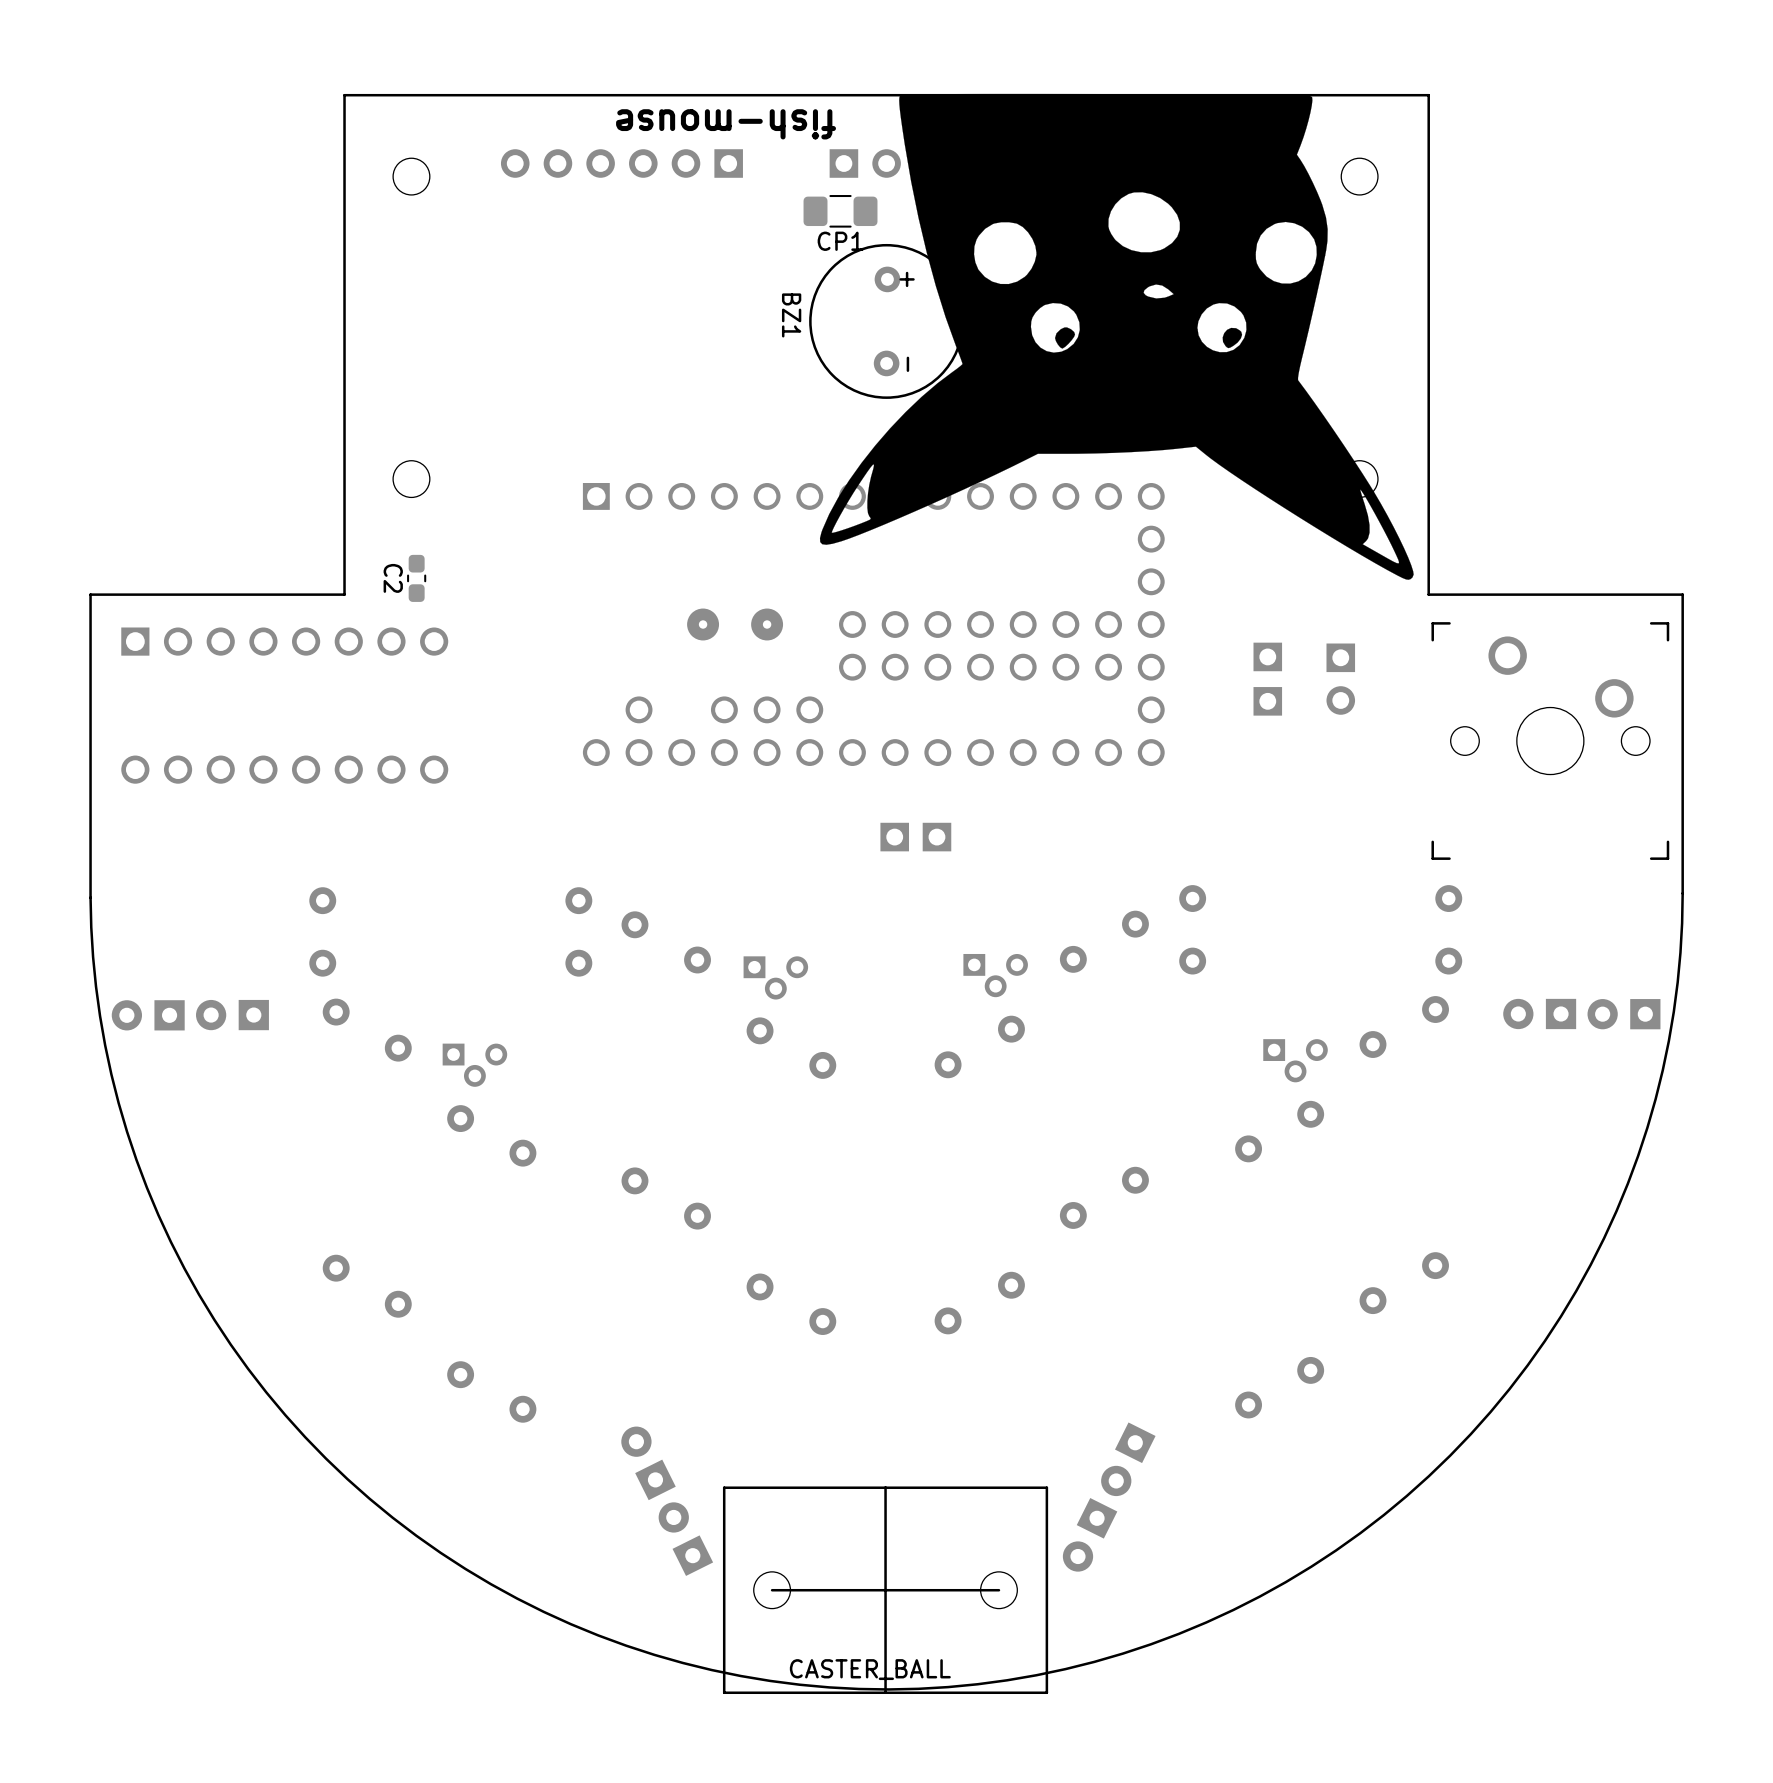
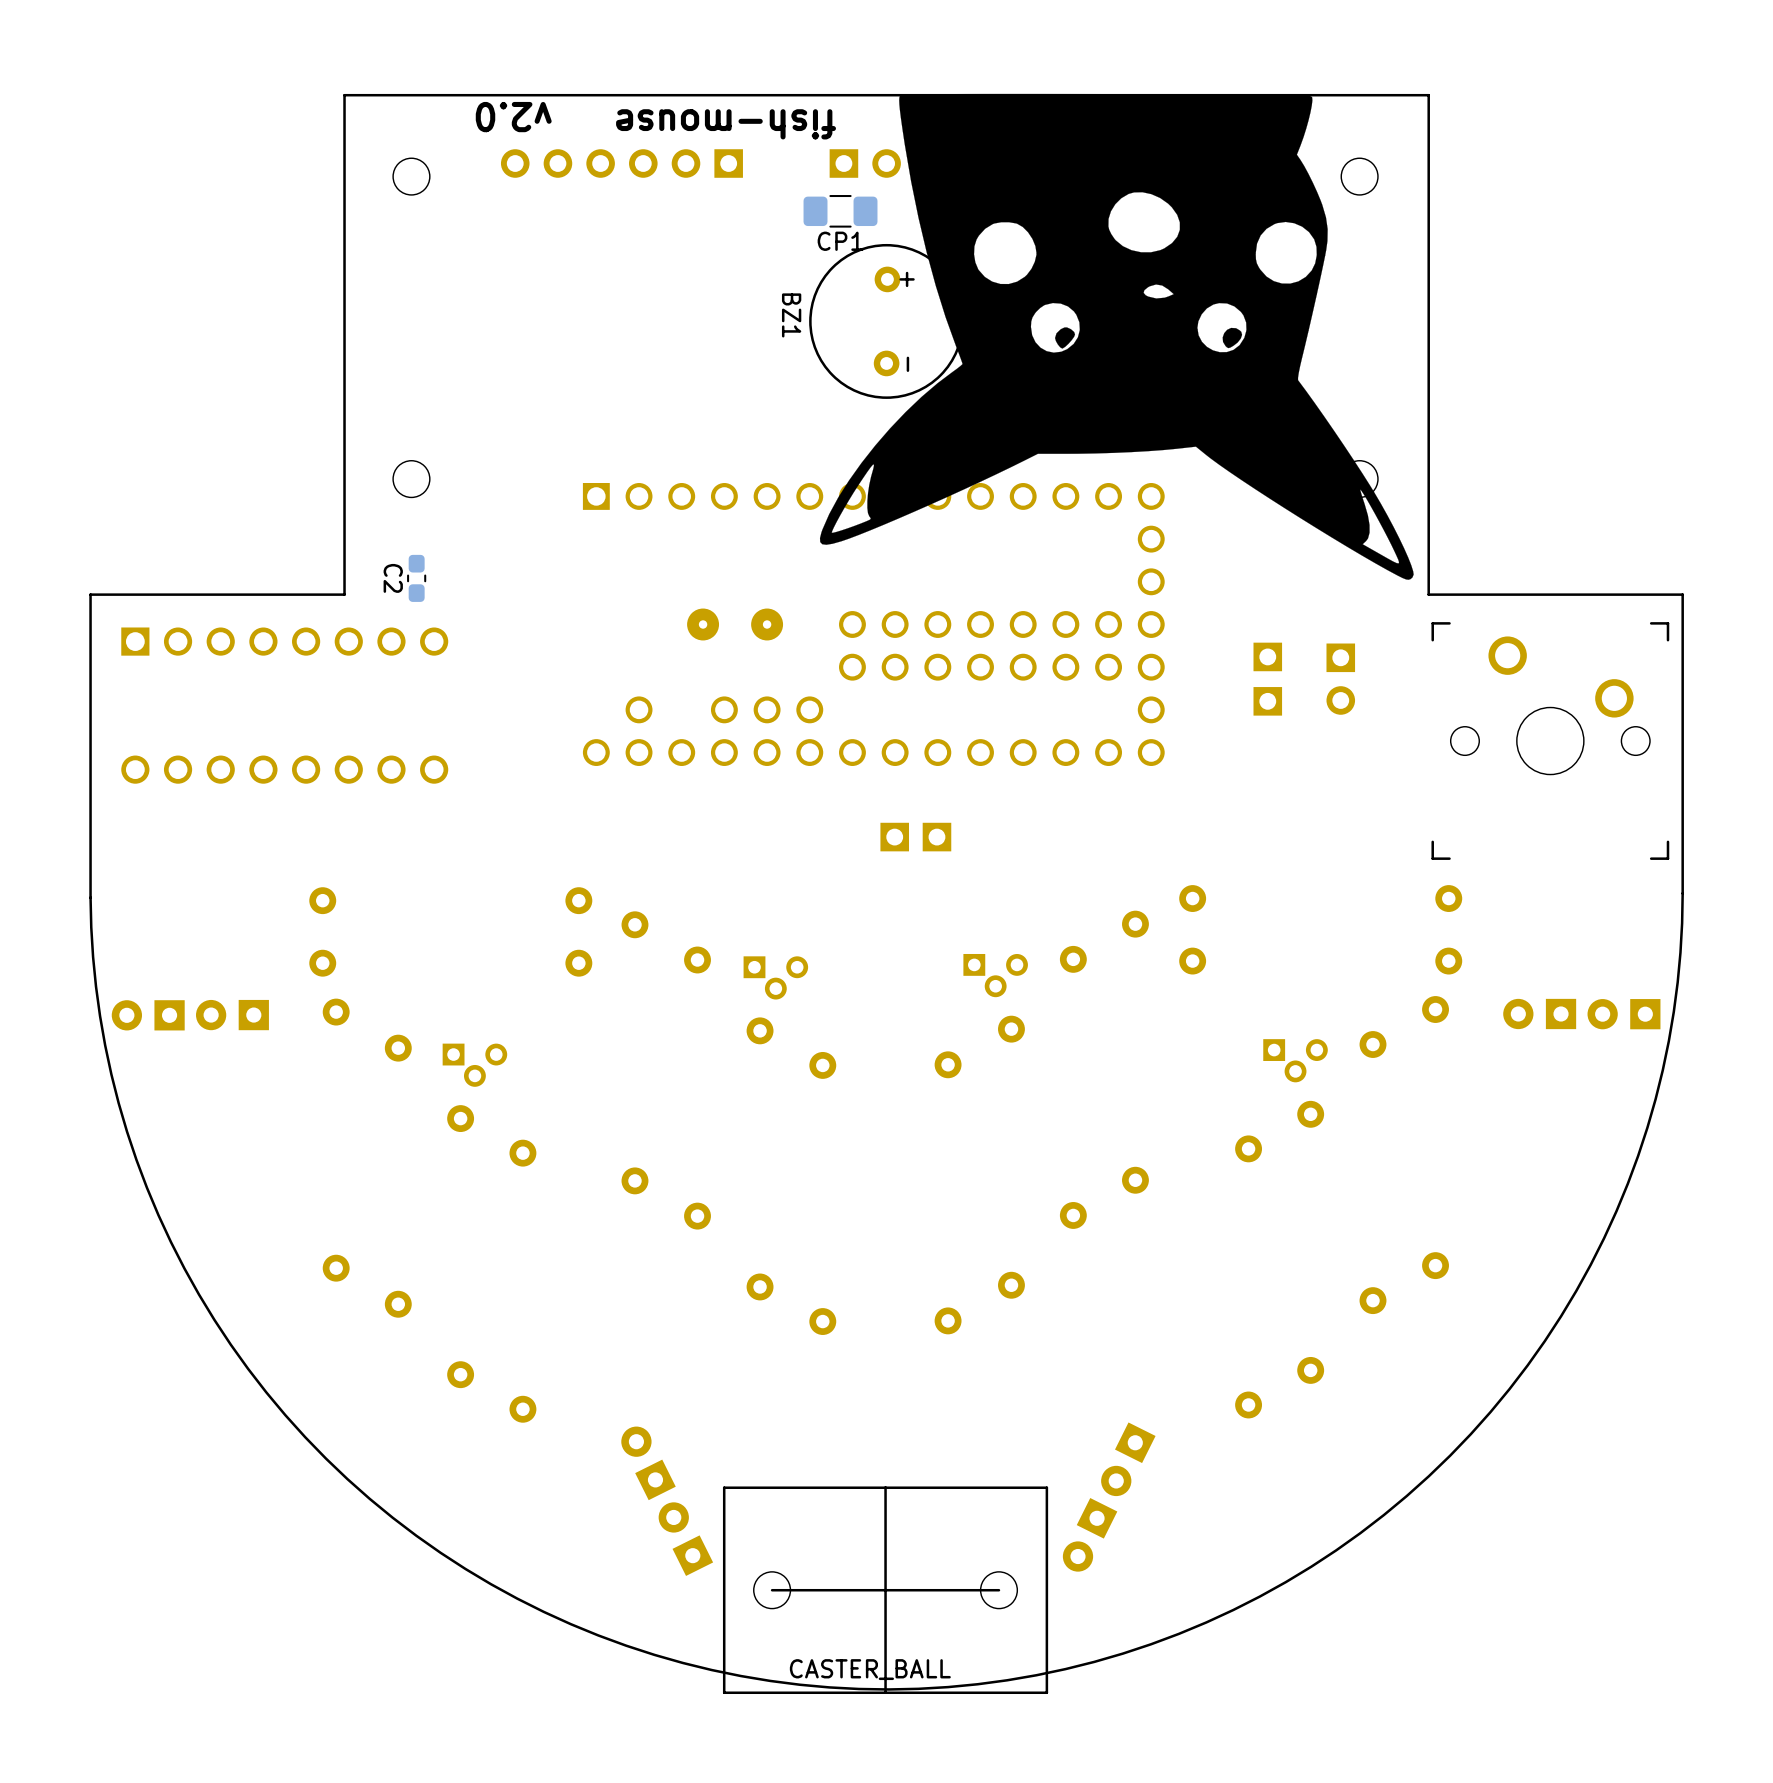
text: none -> v2.0 (513, 117)

